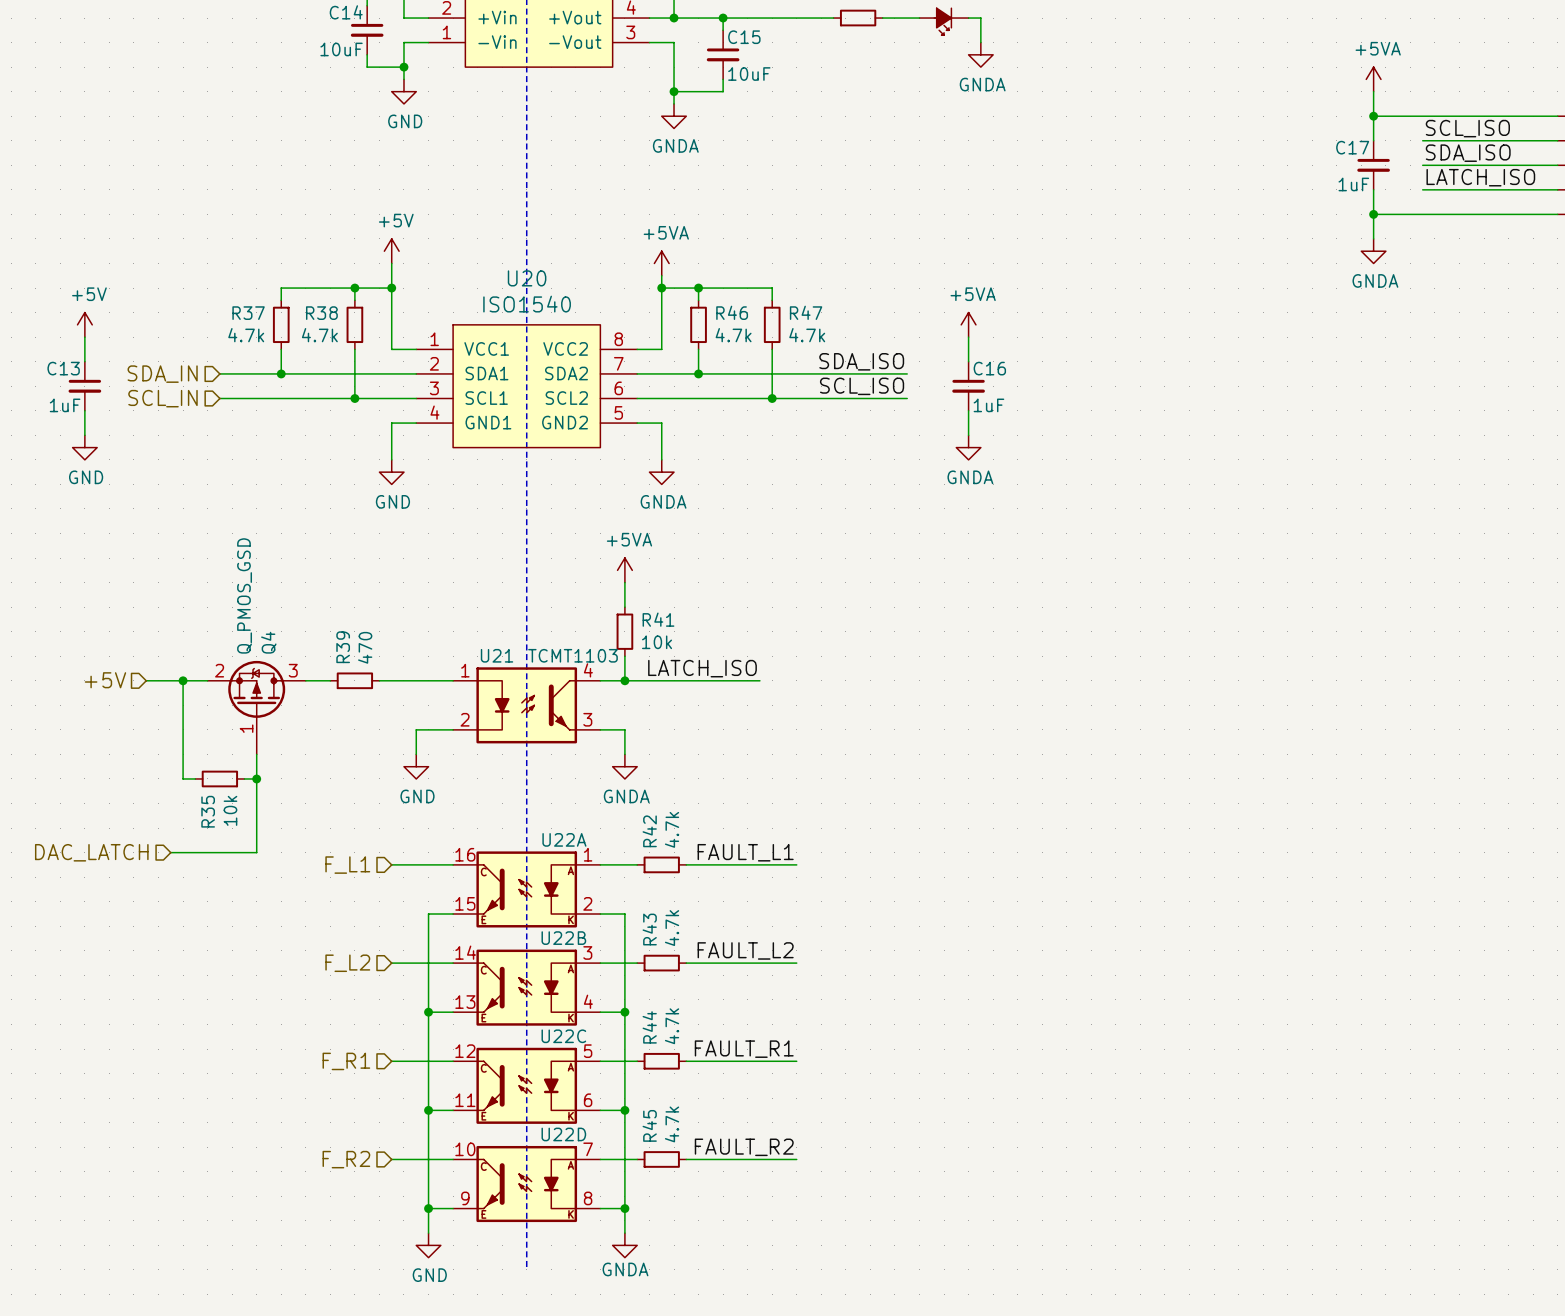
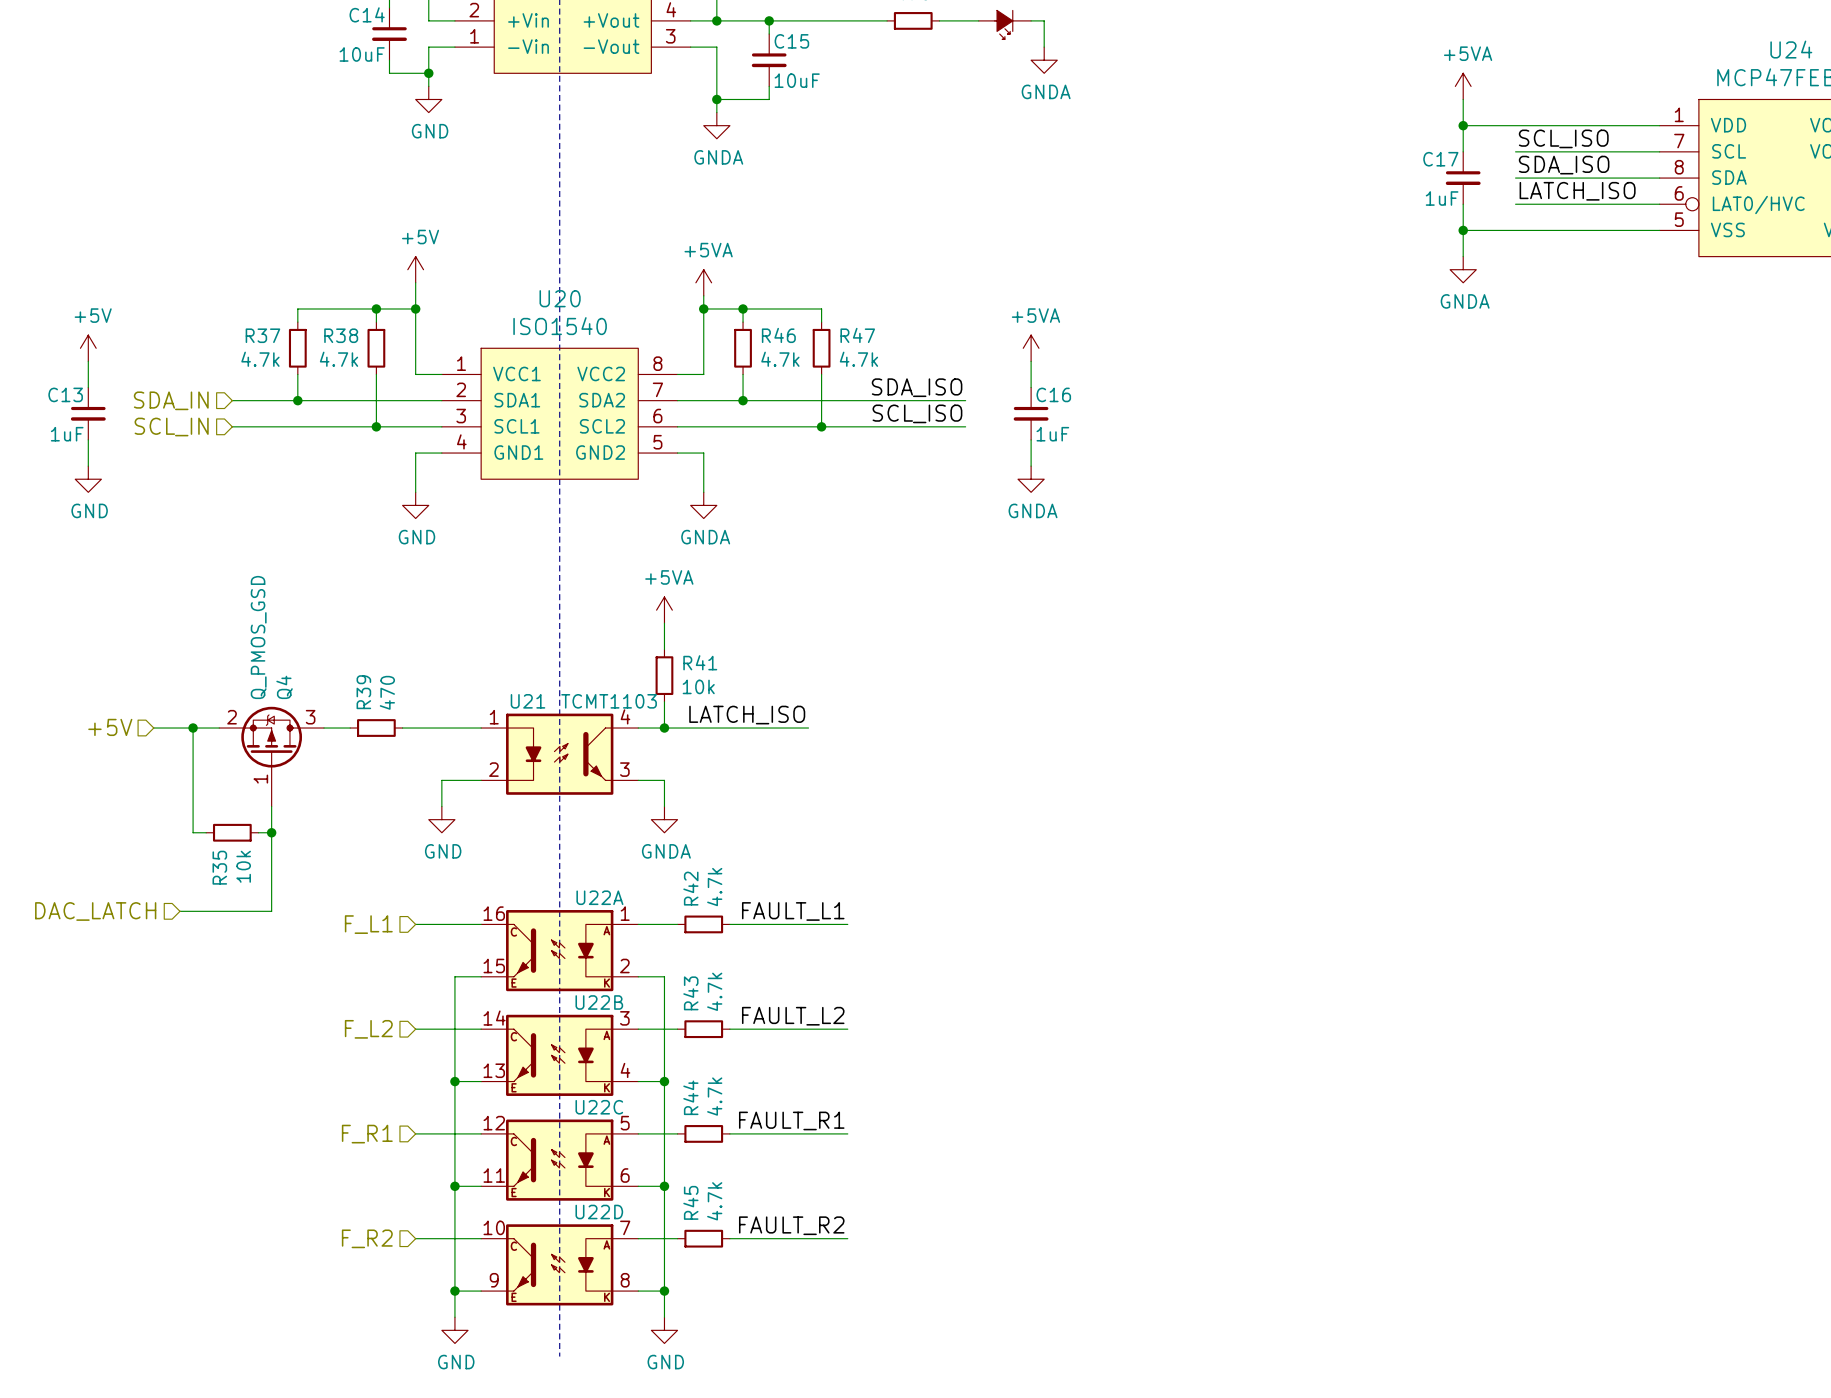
power symbol: GNDA (624, 1245) -> GND (664, 1330)

